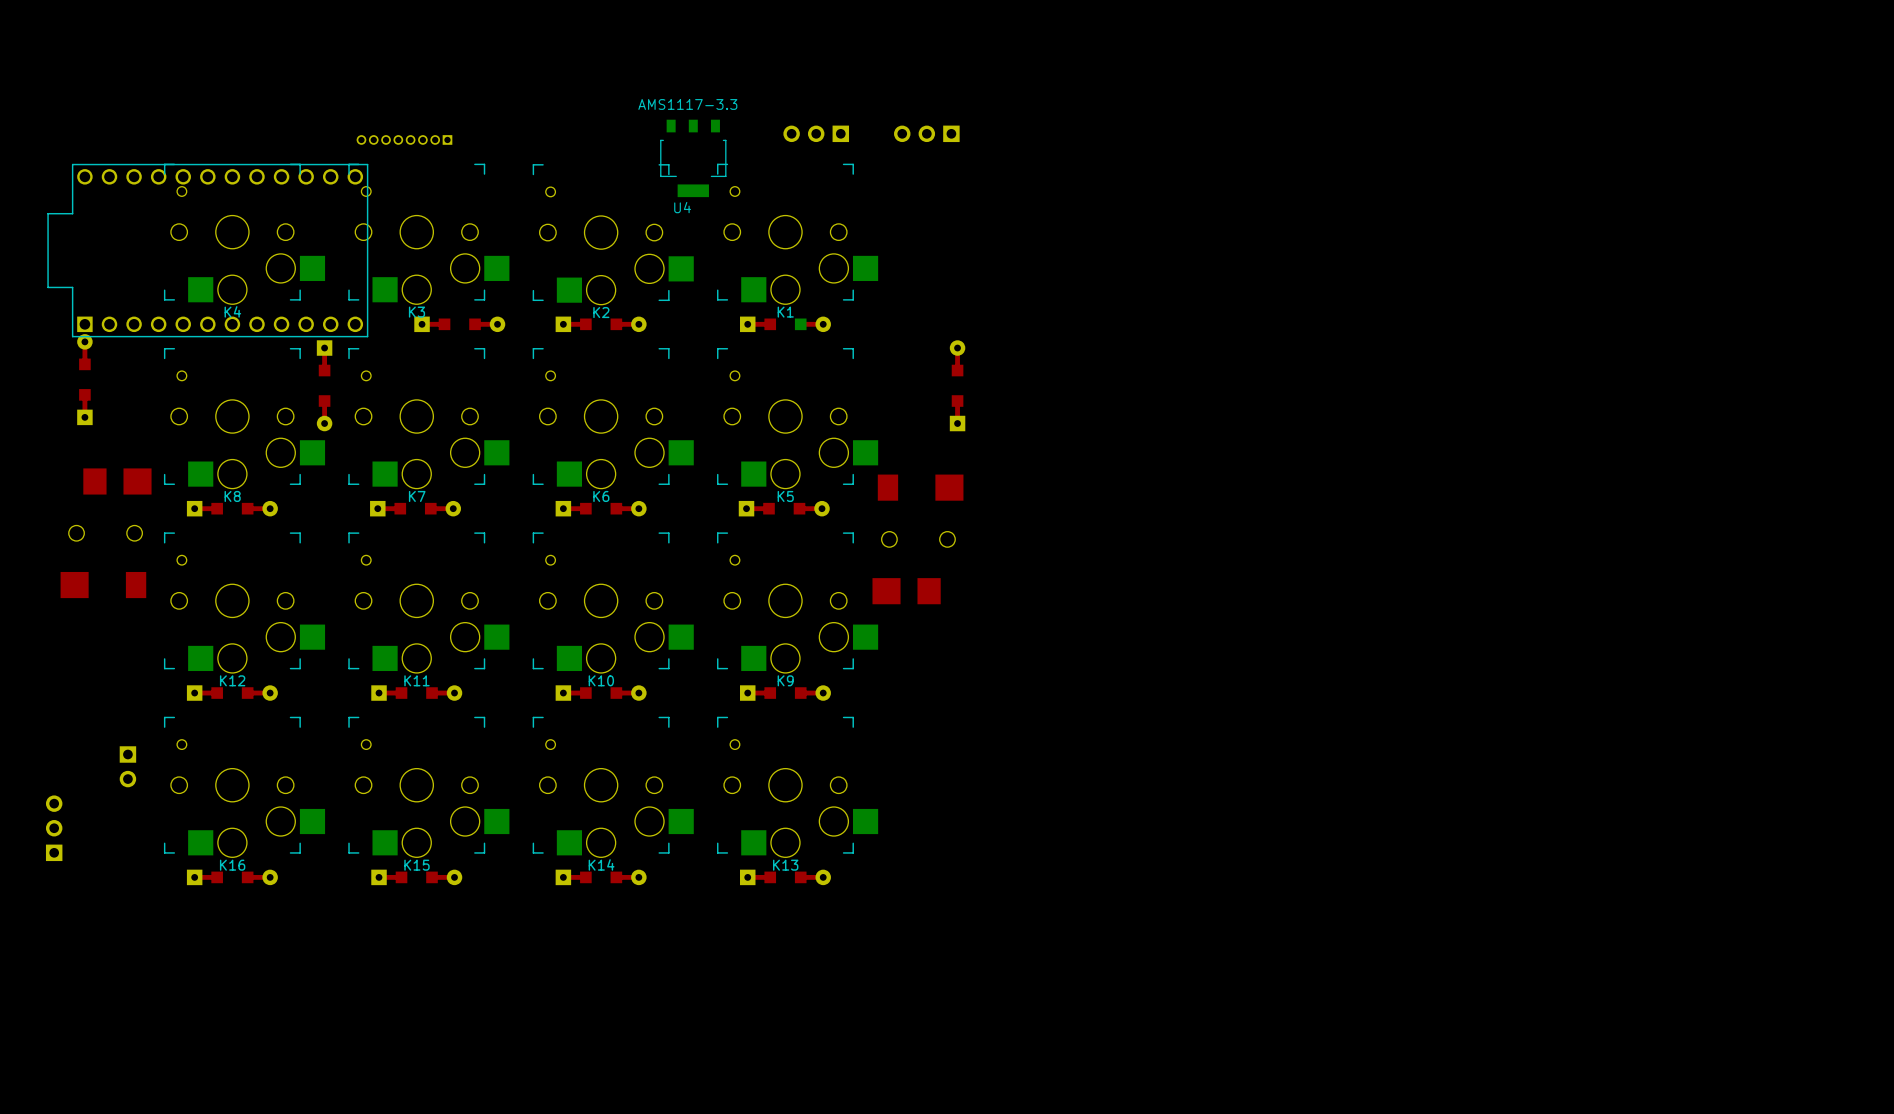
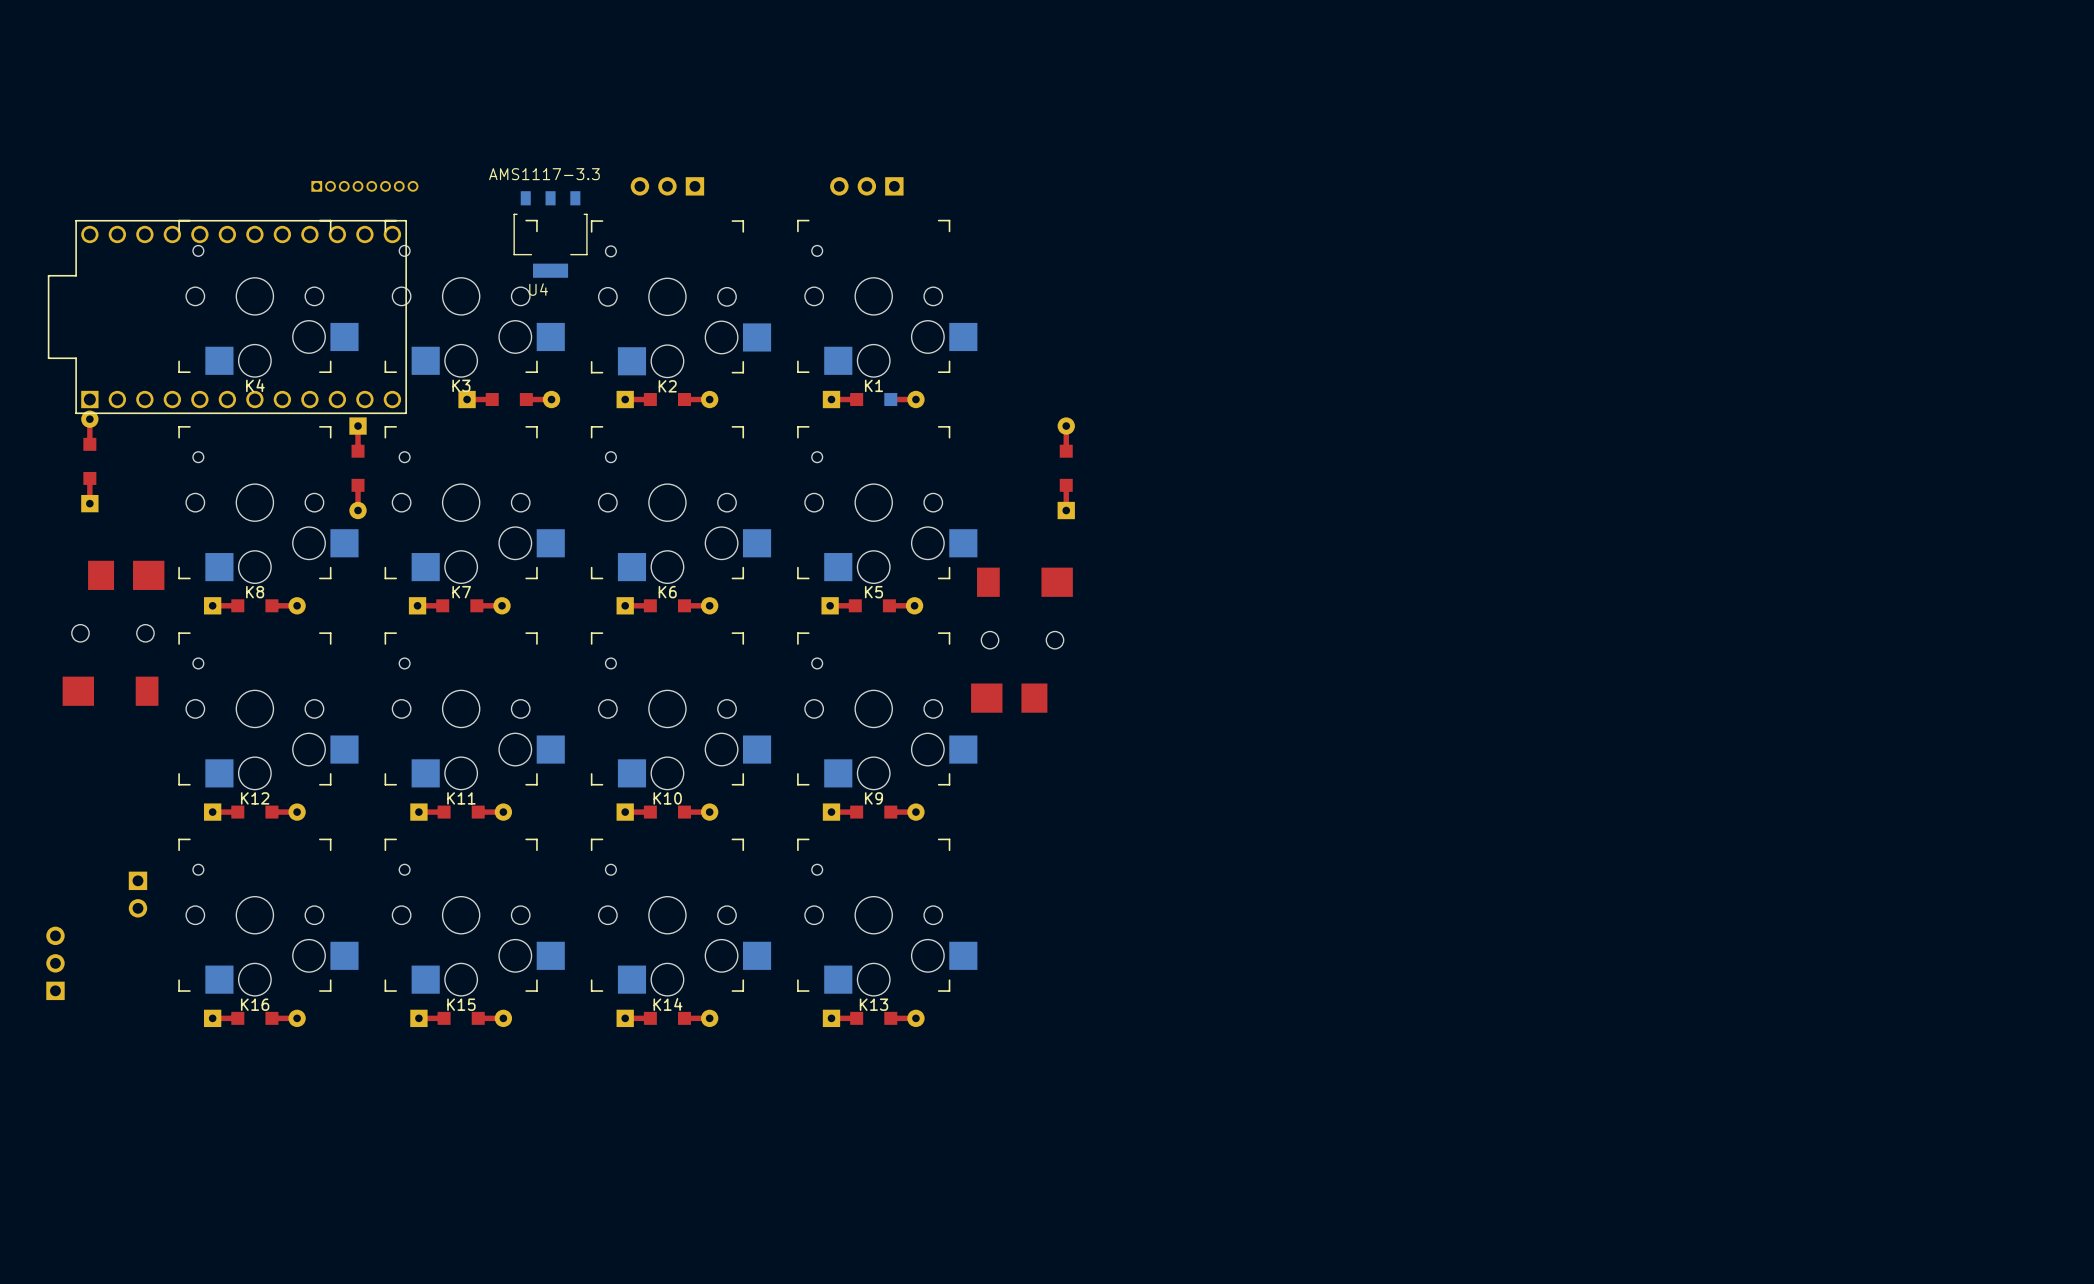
part: none -> (667, 186)
part position: (816, 133) -> (866, 186)
part: (926, 133) -> none
part rotation: 0° (404, 139) -> 180° (364, 186)
part position: (404, 139) -> (364, 186)
U4 position: (693, 158) -> (550, 234)

